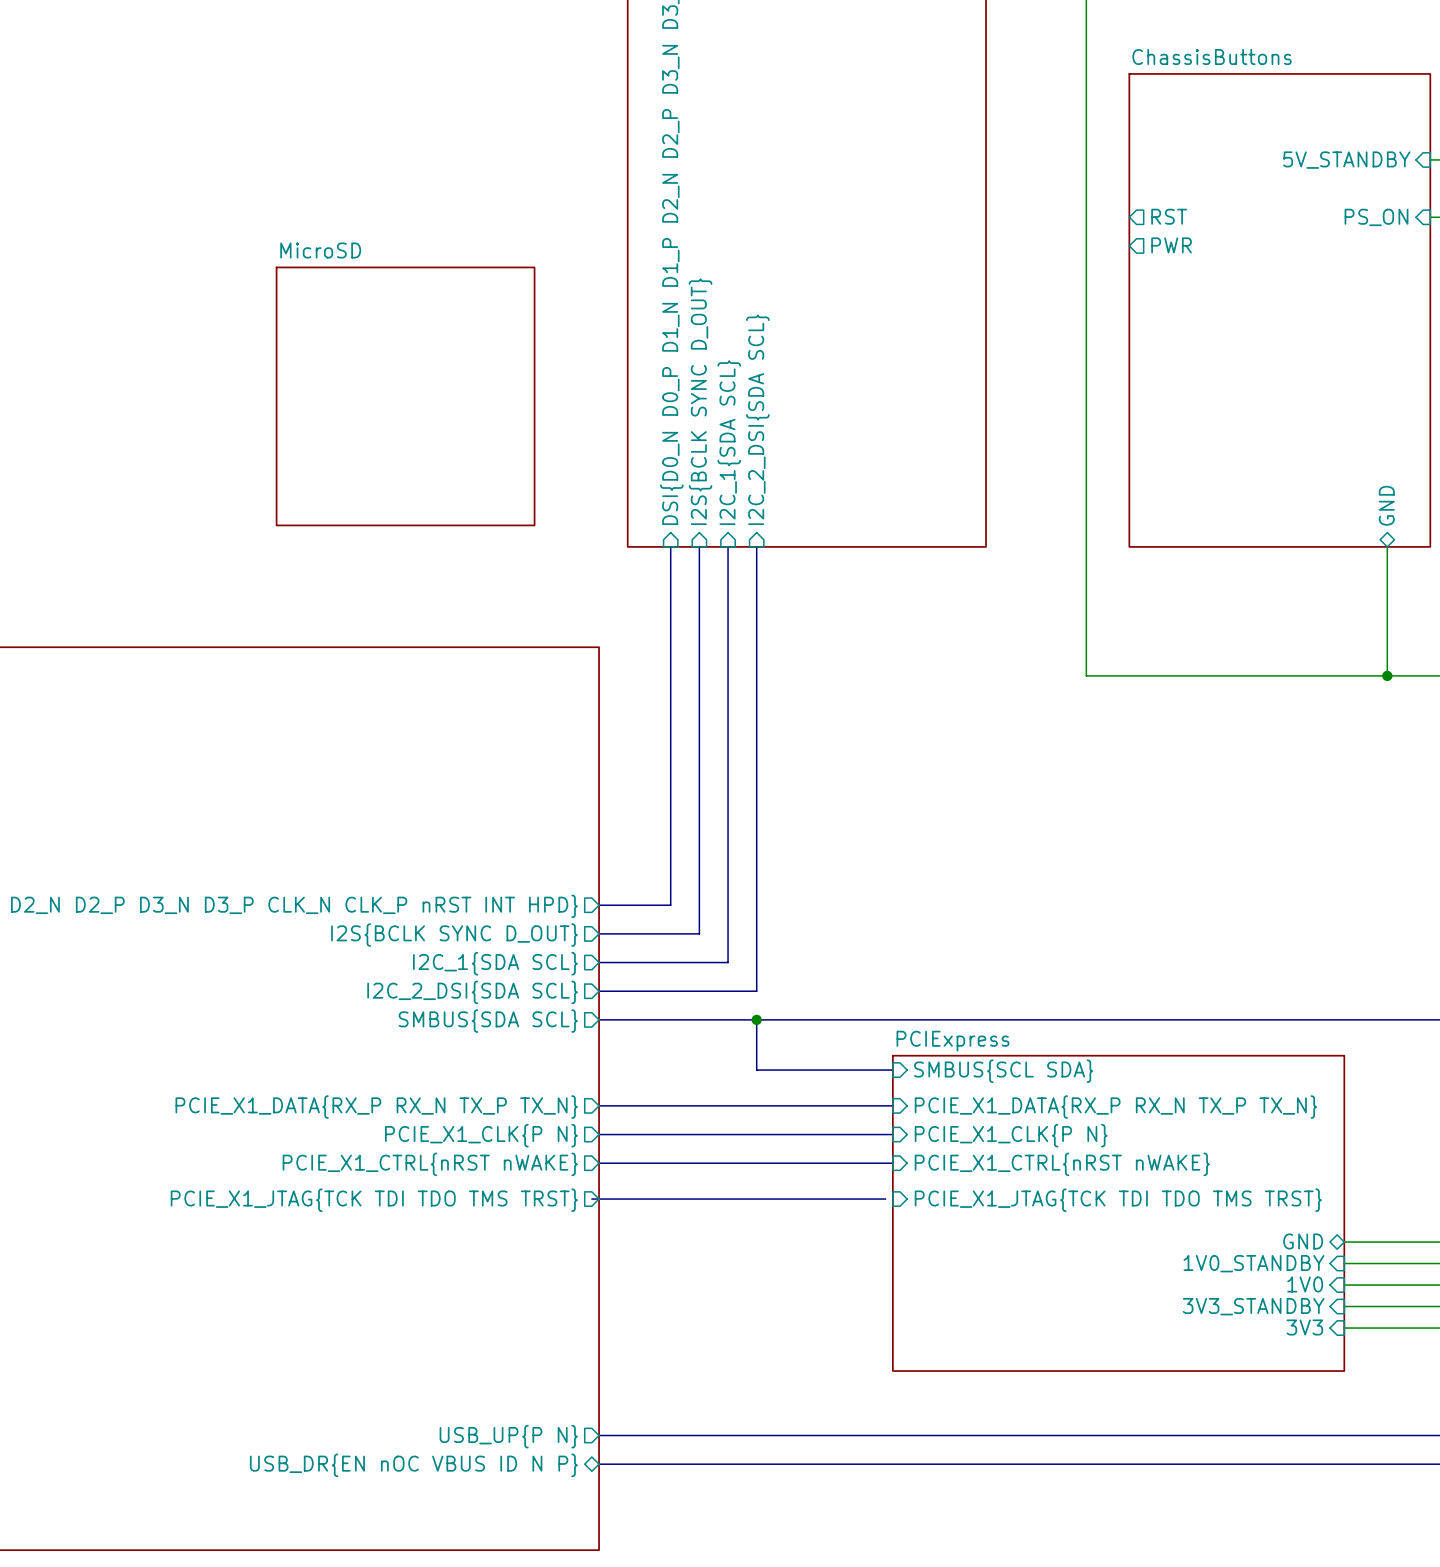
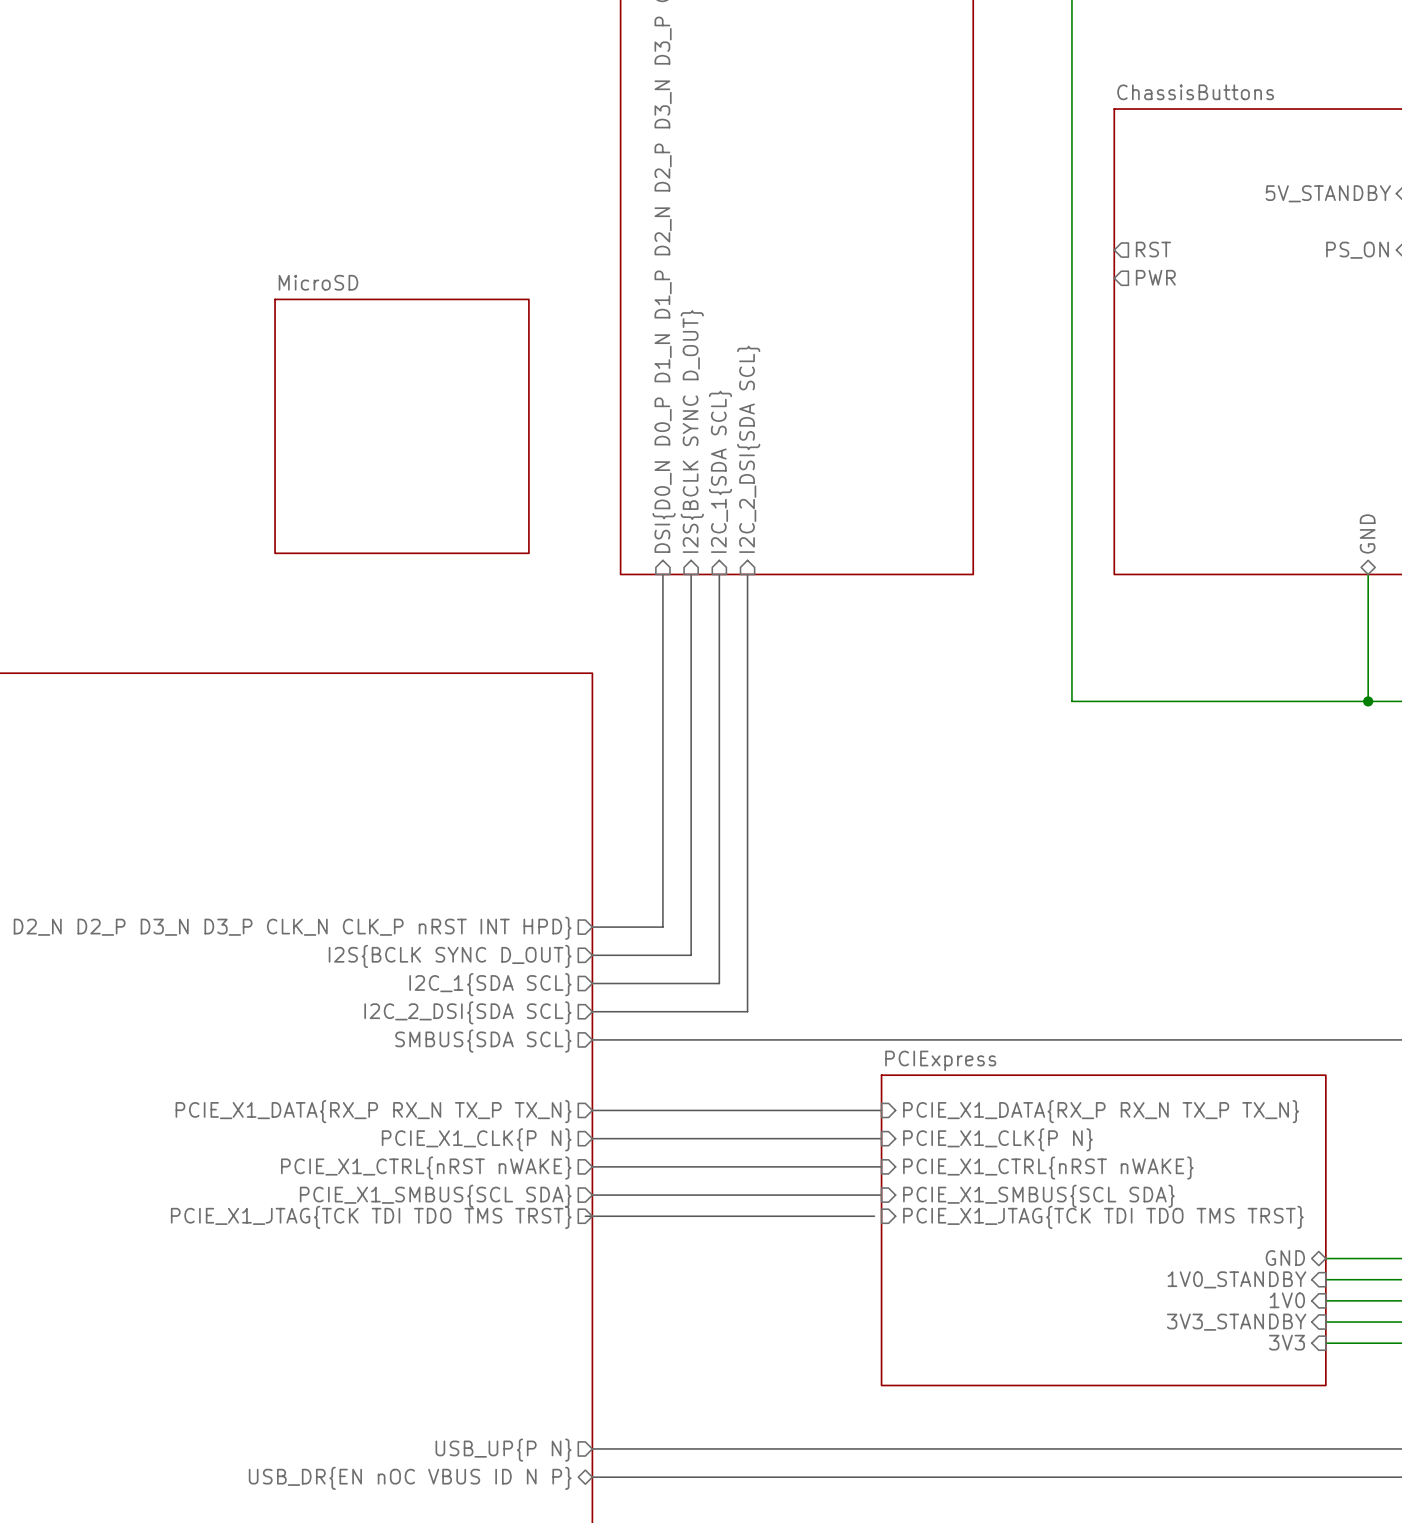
bus: (756, 1019) (756, 1070) (892, 1070) -> none
junction: (756, 1019) -> none
sheet pin: SMBUS{SCL SDA} (1003, 1071) -> none
bus: (599, 1105) (892, 1105) -> (592, 1110) (881, 1110)
sheet pin position: PCIE_X1_DATA{RX_P RX_N TX_P TX_N} (376, 1107) -> PCIE_X1_DATA{RX_P RX_N TX_P TX_N} (373, 1111)
sheet pin position: PCIE_X1_DATA{RX_P RX_N TX_P TX_N} (1115, 1107) -> PCIE_X1_DATA{RX_P RX_N TX_P TX_N} (1101, 1111)
bus: (599, 1134) (892, 1134) -> (592, 1138) (881, 1138)
sheet pin position: PCIE_X1_CLK{P N} (481, 1135) -> PCIE_X1_CLK{P N} (476, 1139)
sheet pin position: PCIE_X1_CLK{P N} (1011, 1135) -> PCIE_X1_CLK{P N} (997, 1139)
bus: (599, 1163) (892, 1163) -> (592, 1166) (881, 1166)
sheet pin position: PCIE_X1_CTRL{nRST nWAKE} (430, 1164) -> PCIE_X1_CTRL{nRST nWAKE} (426, 1168)
sheet pin position: PCIE_X1_CTRL{nRST nWAKE} (1062, 1164) -> PCIE_X1_CTRL{nRST nWAKE} (1048, 1168)
bus: none -> (592, 1195) (881, 1195)
sheet pin: none -> PCIE_X1_SMBUS{SCL SDA} (435, 1196)
sheet pin: none -> PCIE_X1_SMBUS{SCL SDA} (1038, 1196)

